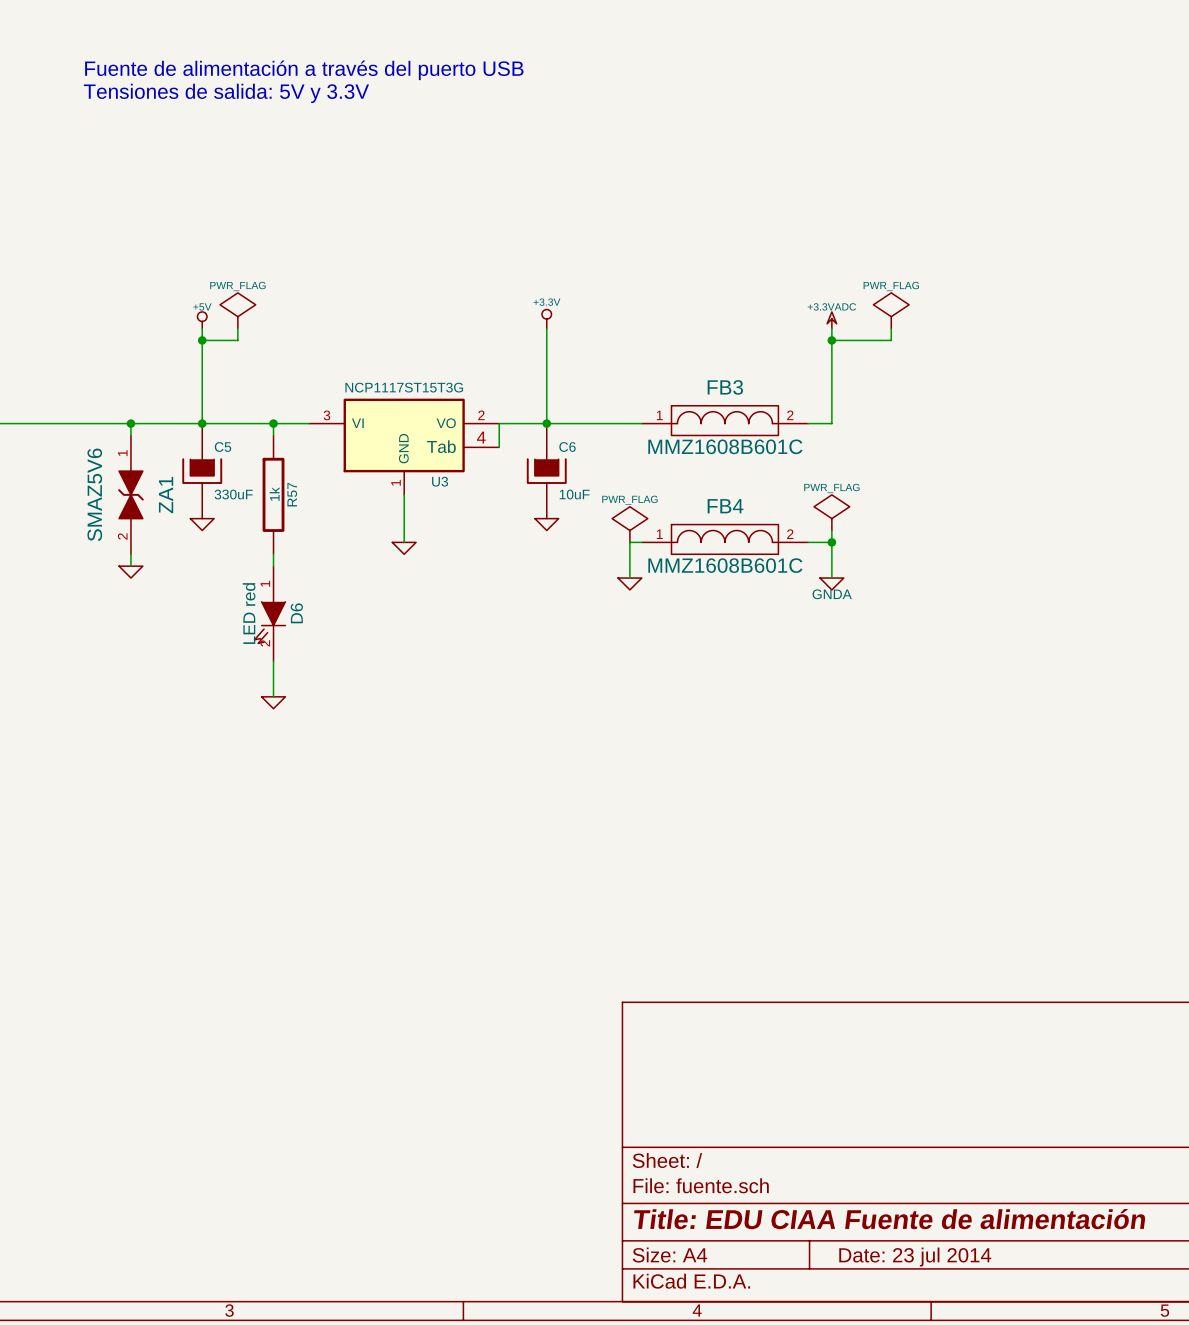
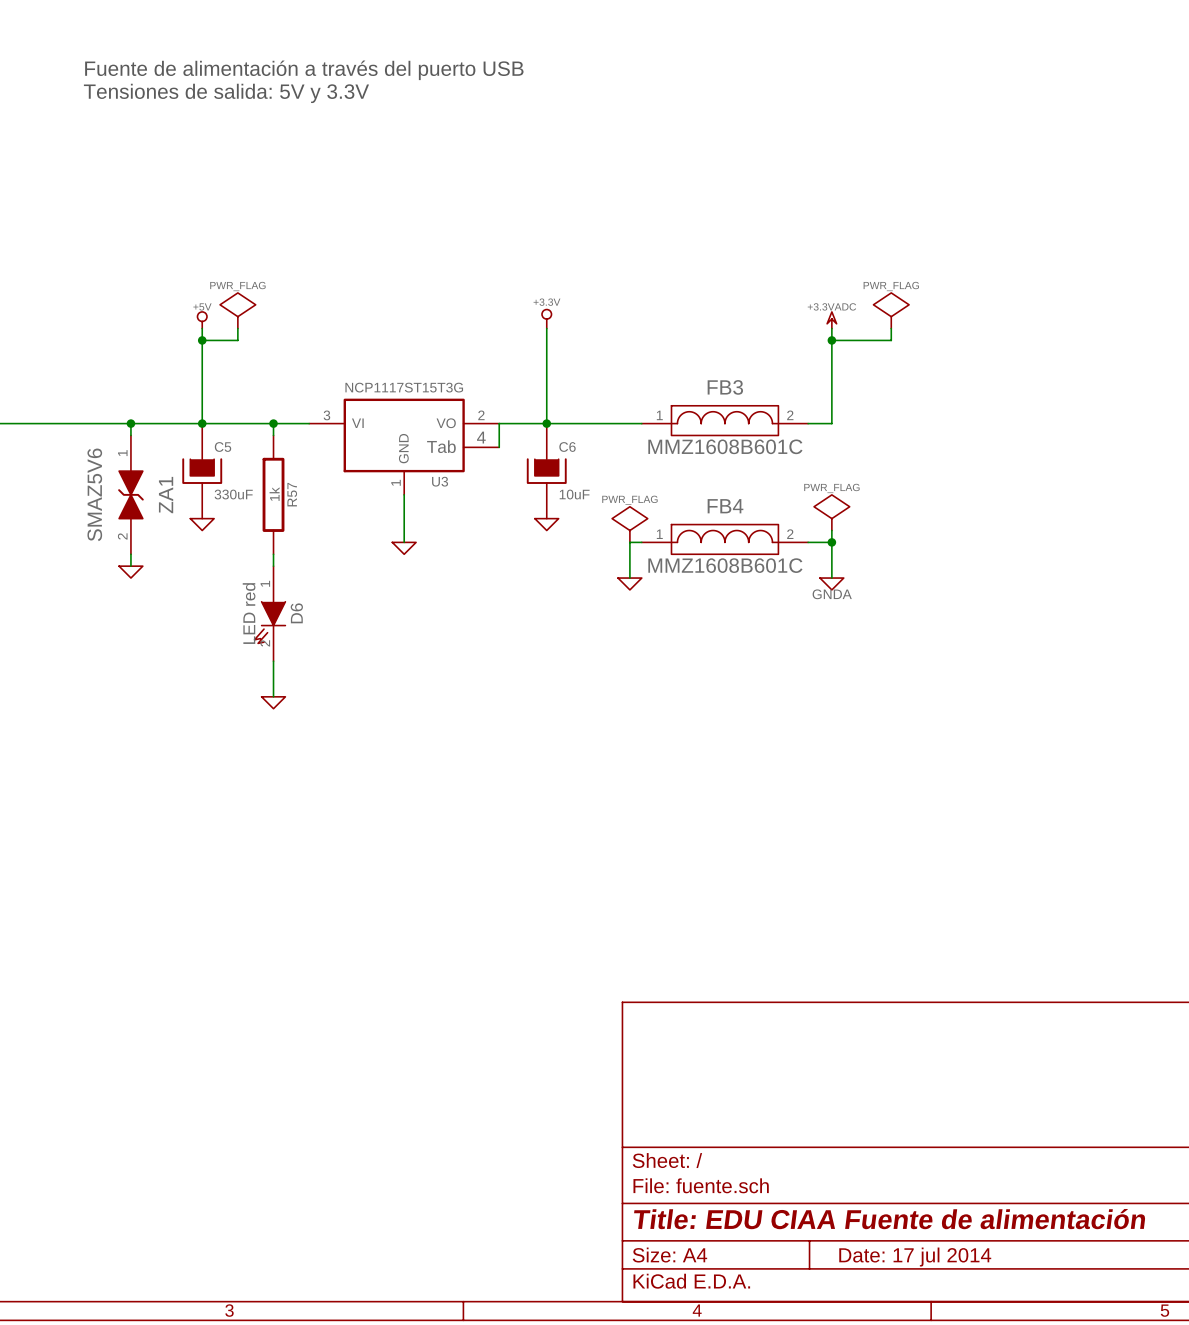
title block: Date: 23 jul 2014 (915, 1257) -> Date: 17 jul 2014 (915, 1257)

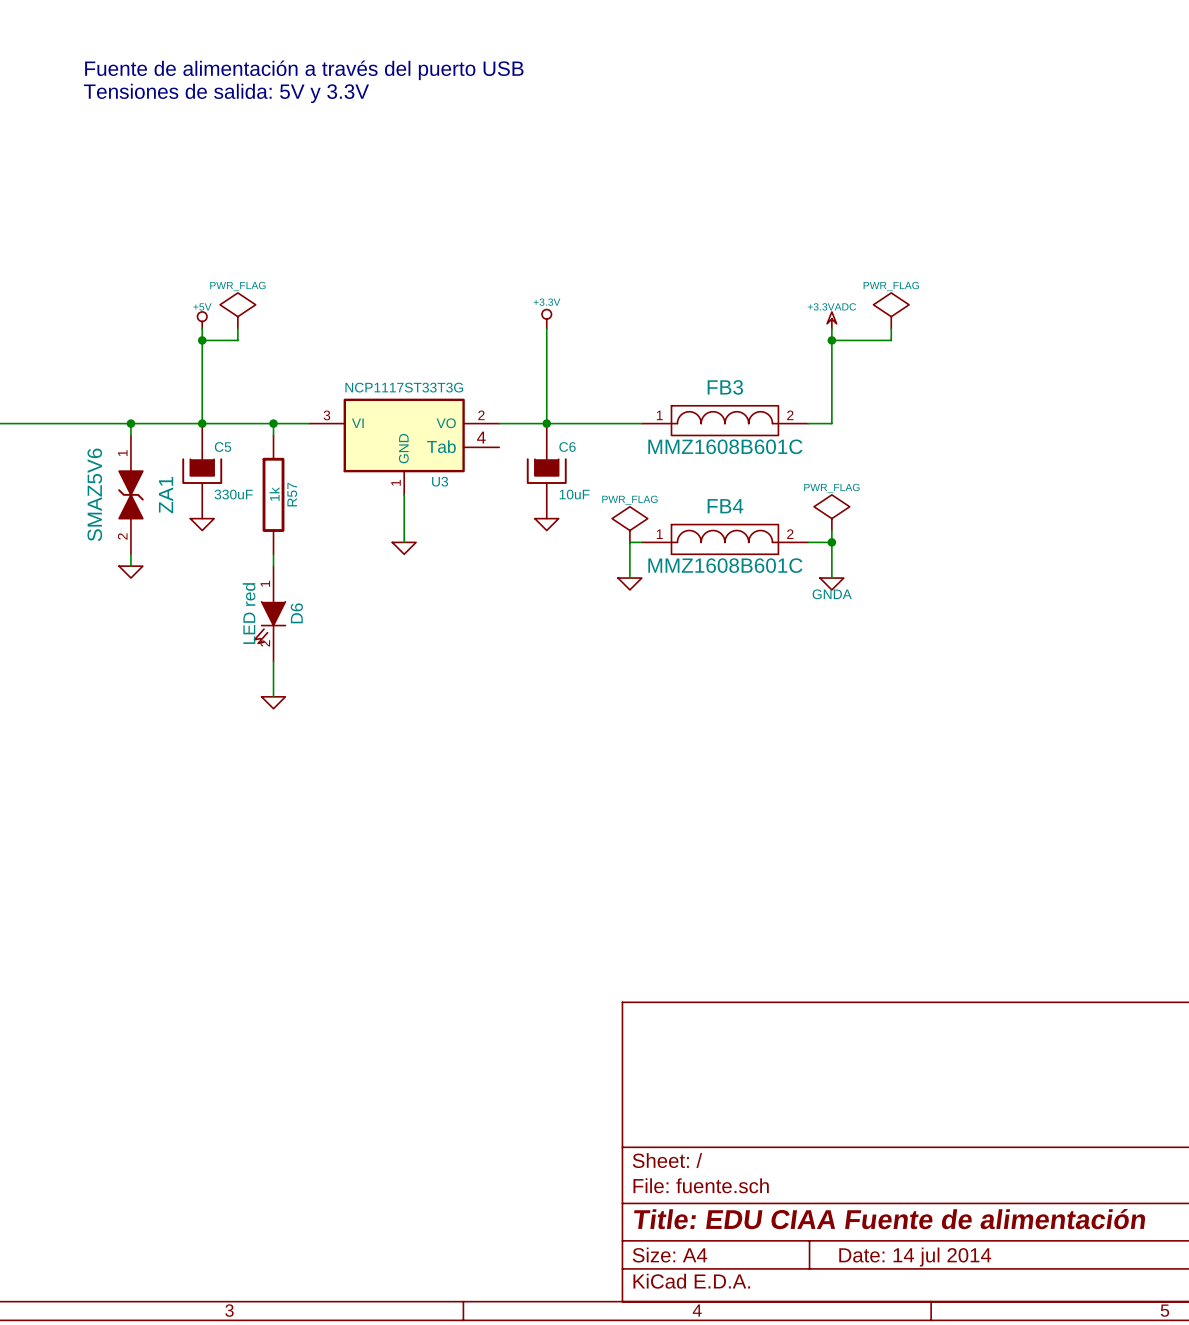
U3 value: NCP1117ST15T3G (404, 387) -> NCP1117ST33T3G (404, 387)
wire: (499, 423) (499, 447) -> none
title block: Date: 17 jul 2014 (915, 1257) -> Date: 14 jul 2014 (915, 1257)

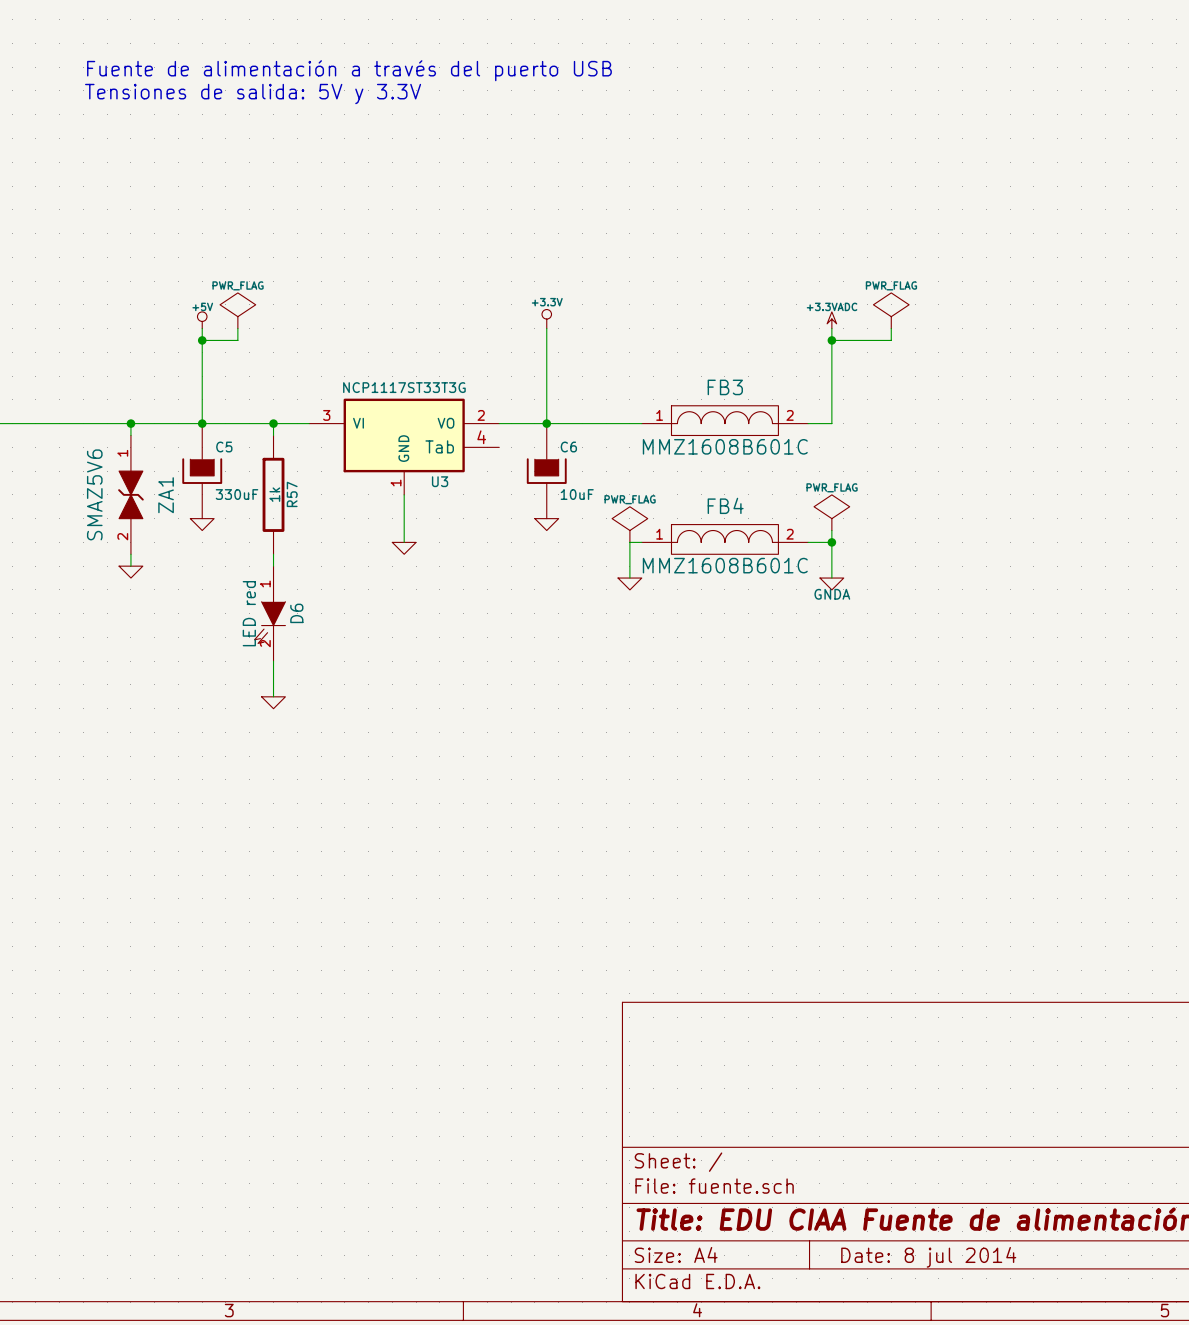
title block: Date: 14 jul 2014 (915, 1257) -> Date: 8 jul 2014 (928, 1257)

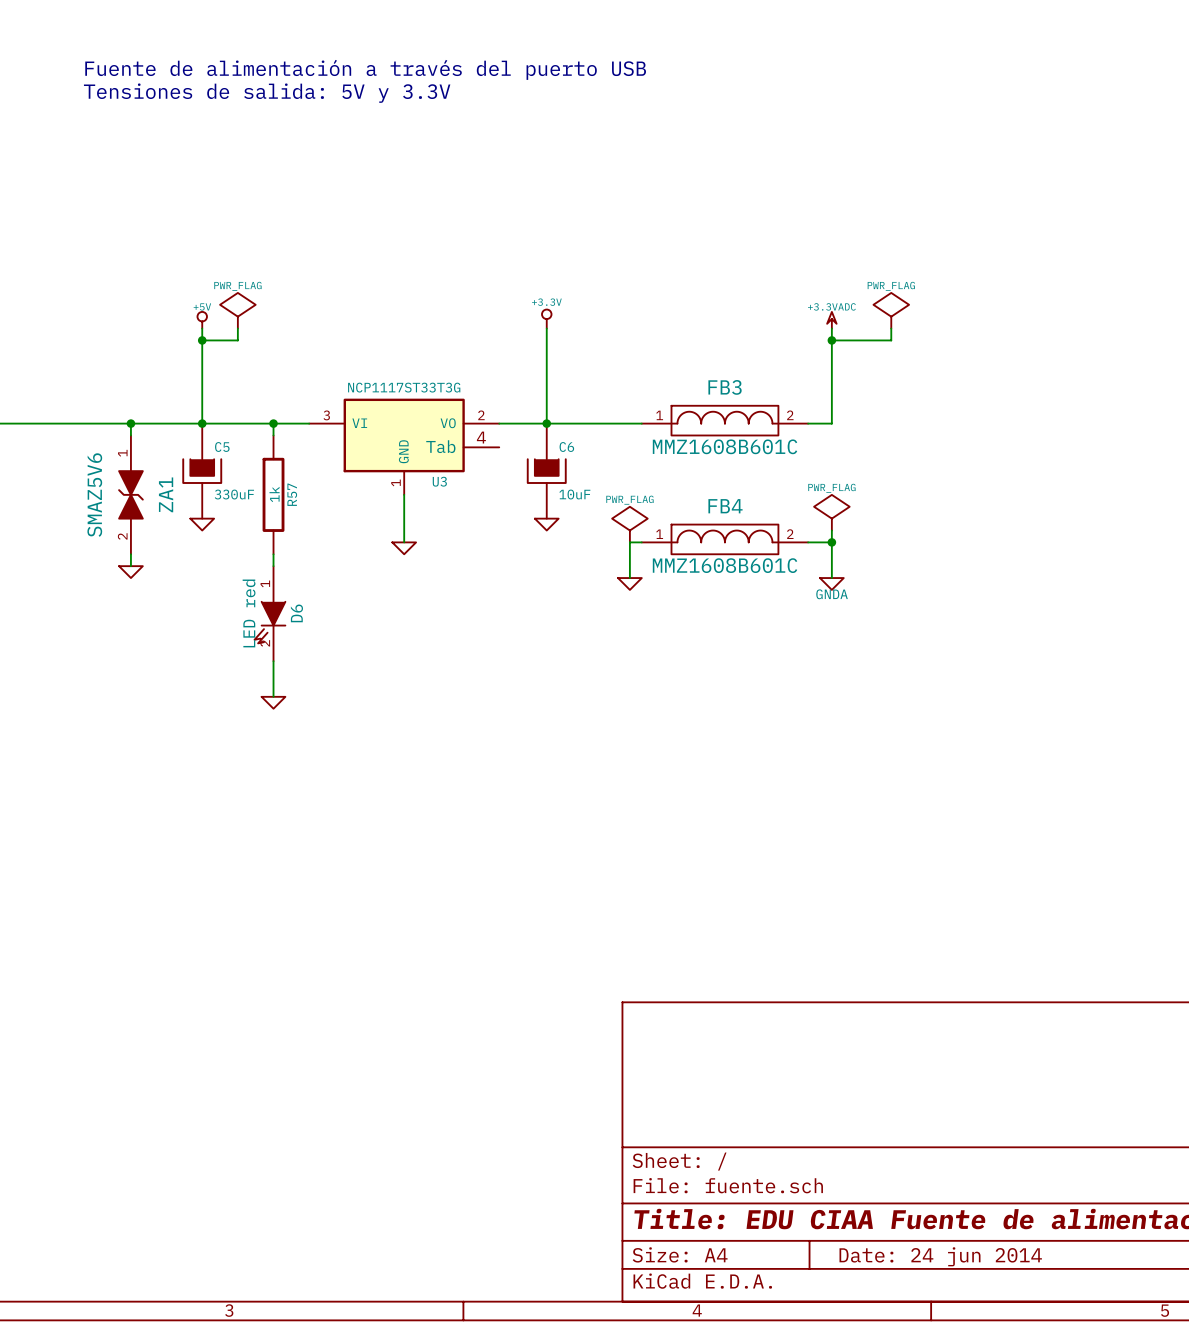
title block: Date: 8 jul 2014 (928, 1257) -> Date: 24 jun 2014 (940, 1256)

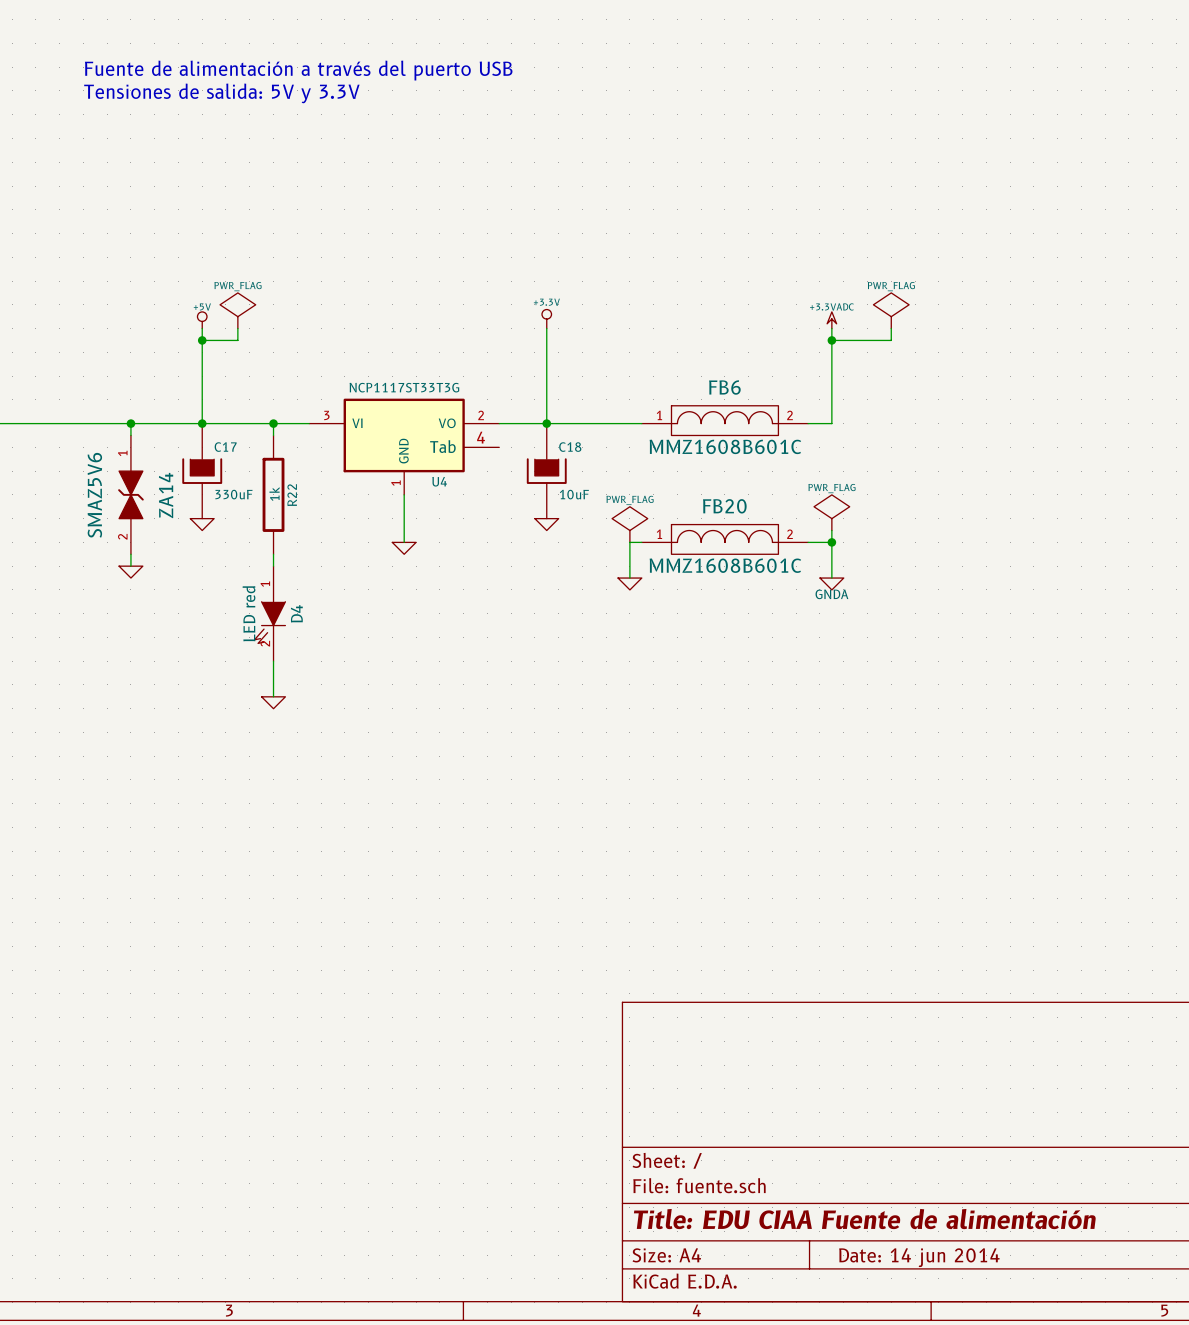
FB3 name: FB3 (725, 387) -> FB6 (724, 387)
C5 name: C5 (222, 447) -> C17 (225, 447)
C6 name: C6 (566, 447) -> C18 (570, 447)
U3 name: U3 (439, 481) -> U4 (439, 481)
ZA1 name: ZA1 (166, 494) -> ZA14 (166, 495)
R57 name: R57 (292, 494) -> R22 (292, 495)
FB4 name: FB4 (725, 506) -> FB20 (724, 506)
D6 name: D6 (296, 613) -> D4 (296, 613)
title block: Date: 24 jun 2014 (940, 1256) -> Date: 14 jun 2014 (919, 1257)

